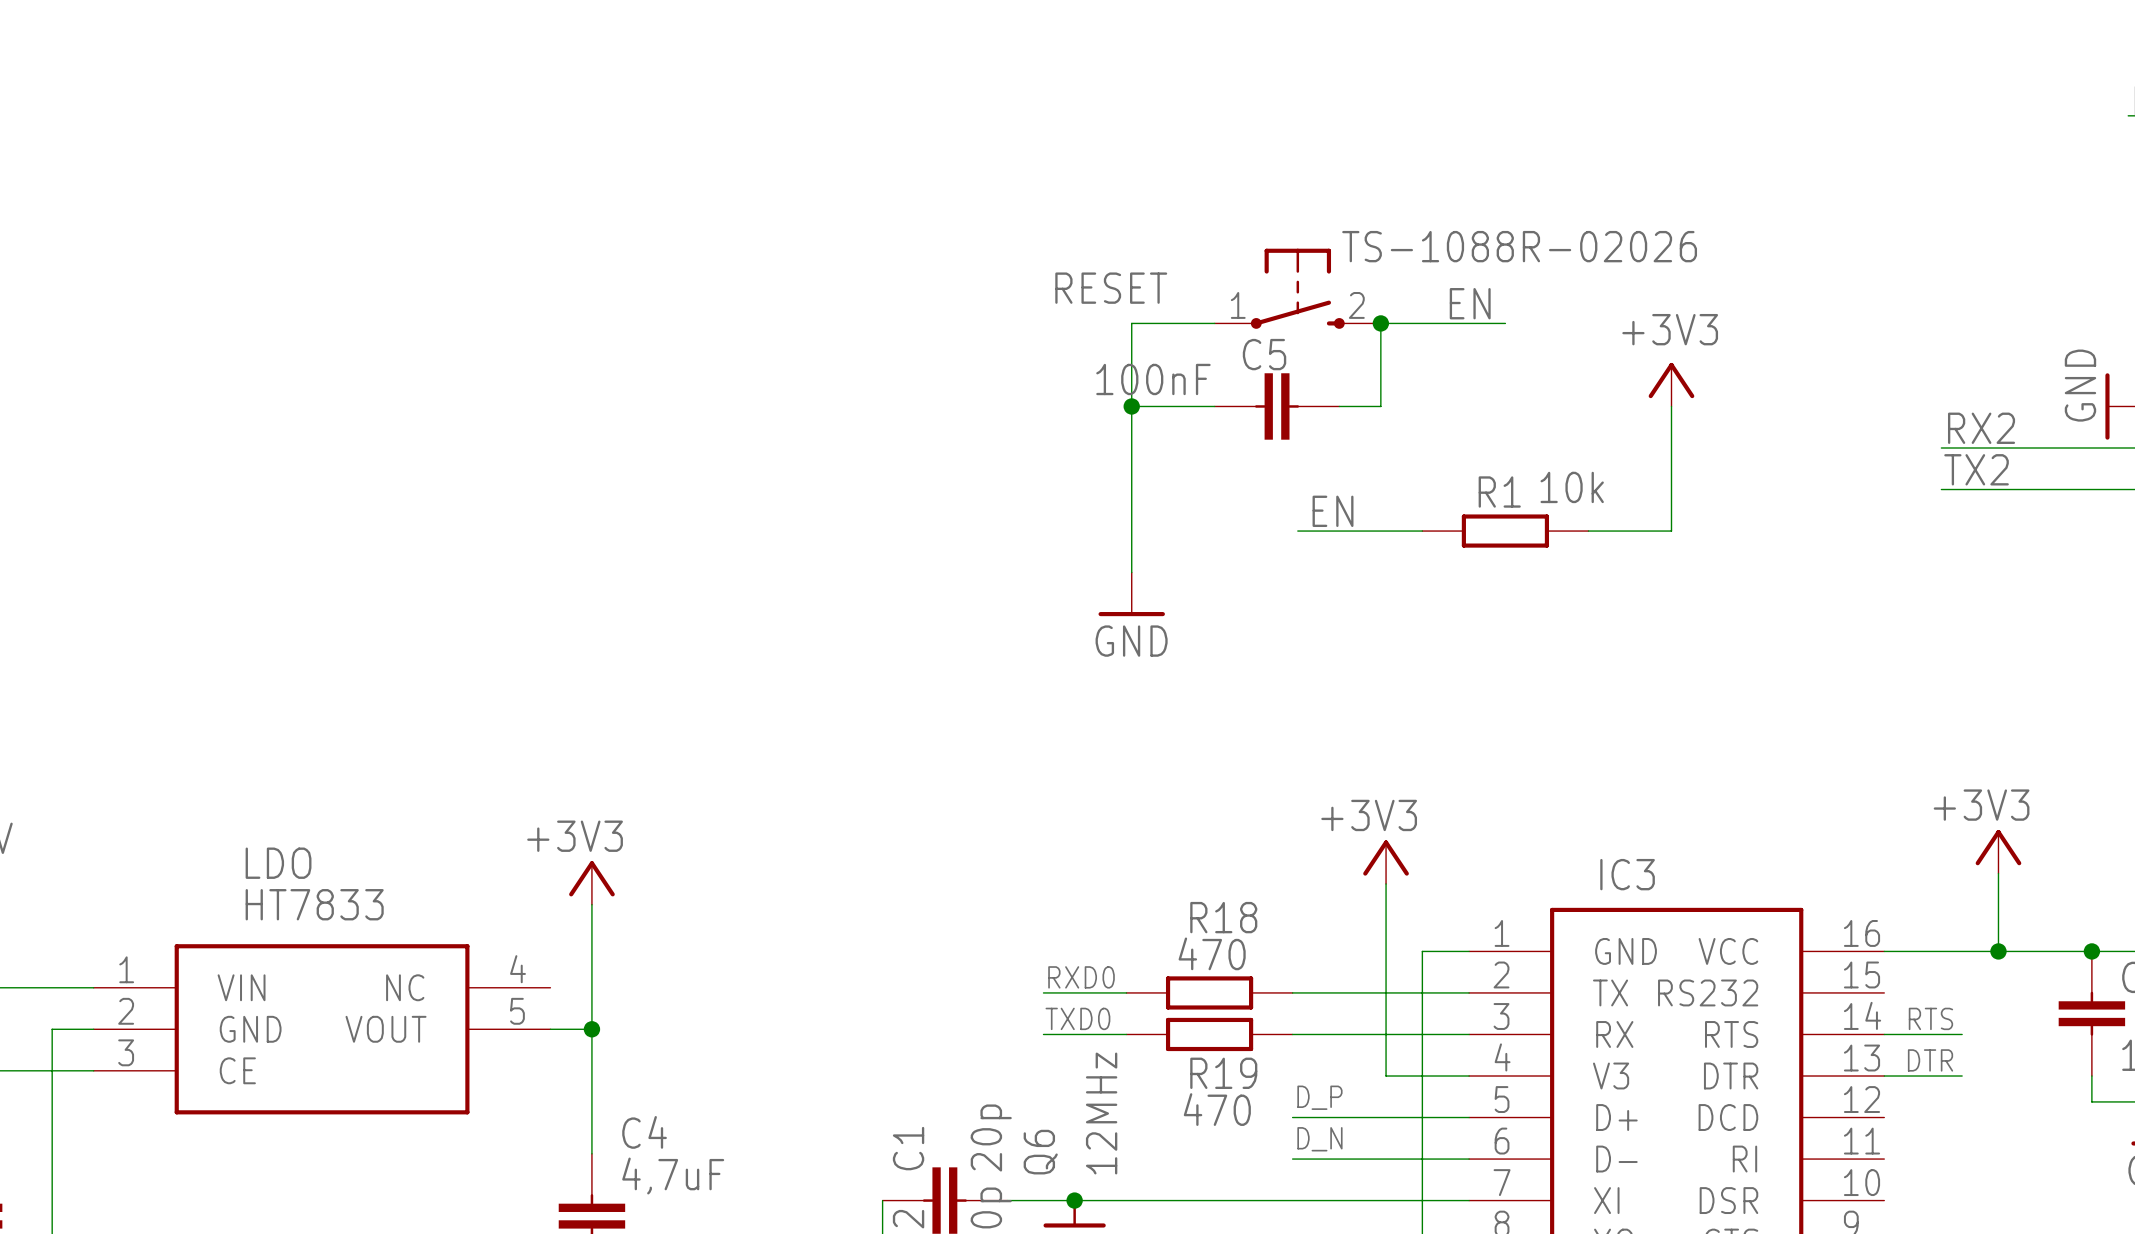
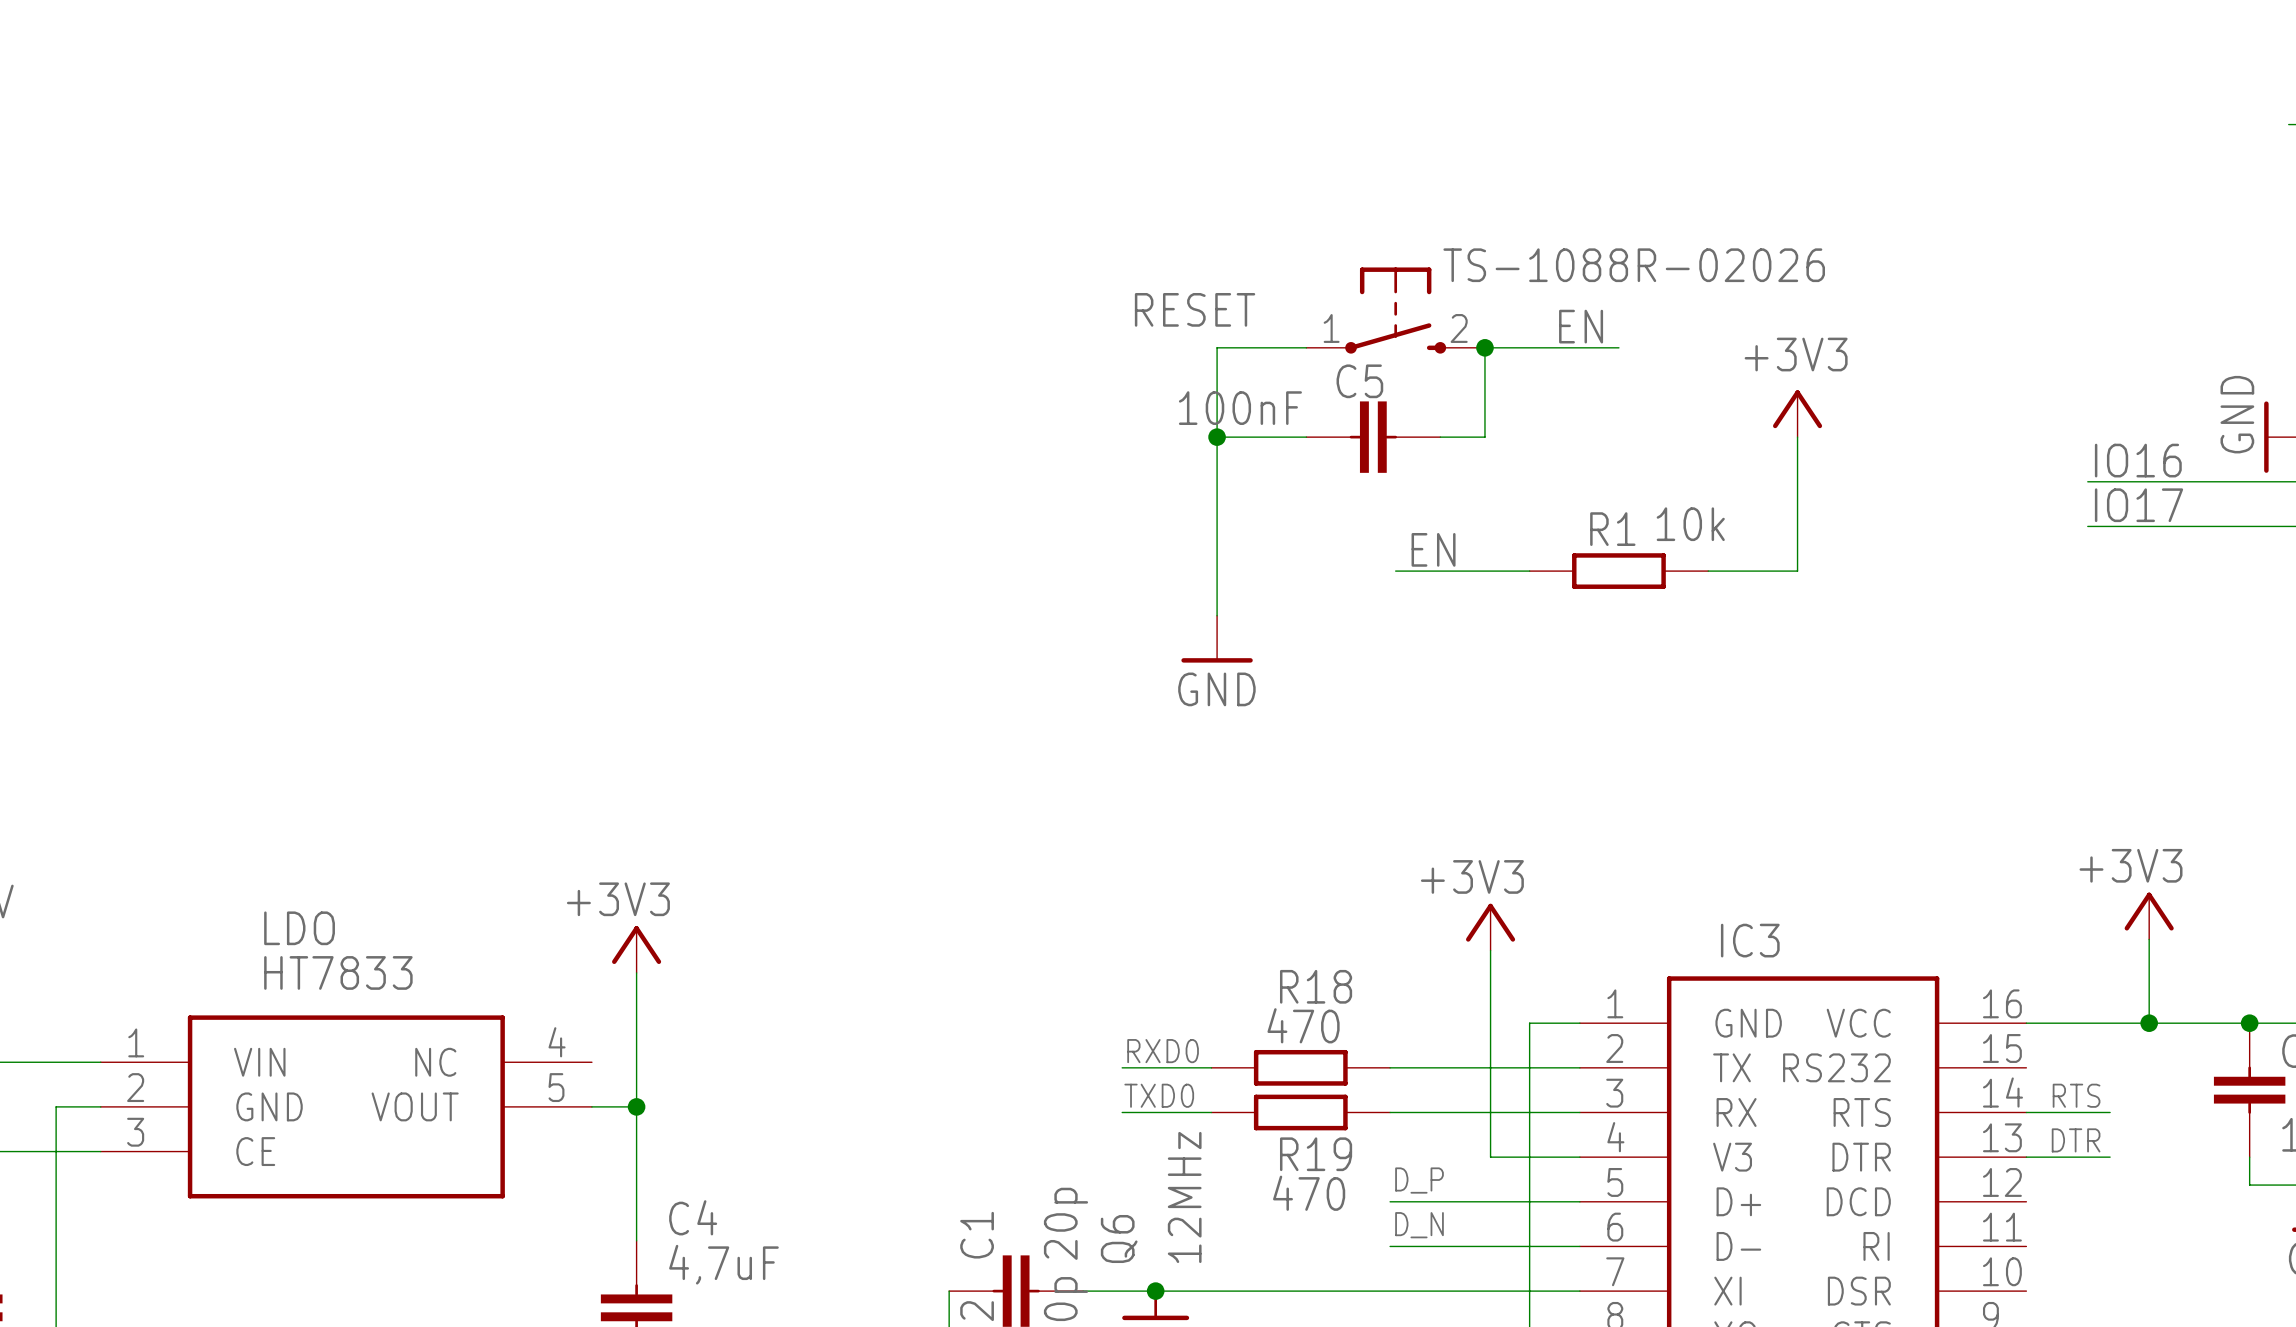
label: RX2 (1981, 428) -> IO16 (2138, 460)
label: TX2 (1976, 469) -> IO17 (2138, 505)

